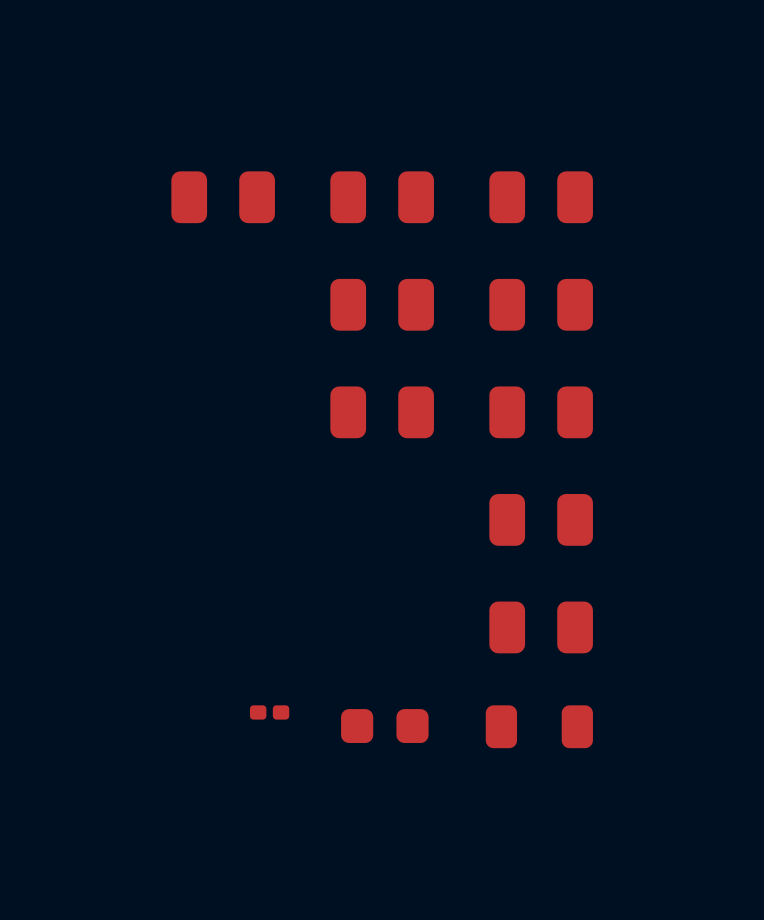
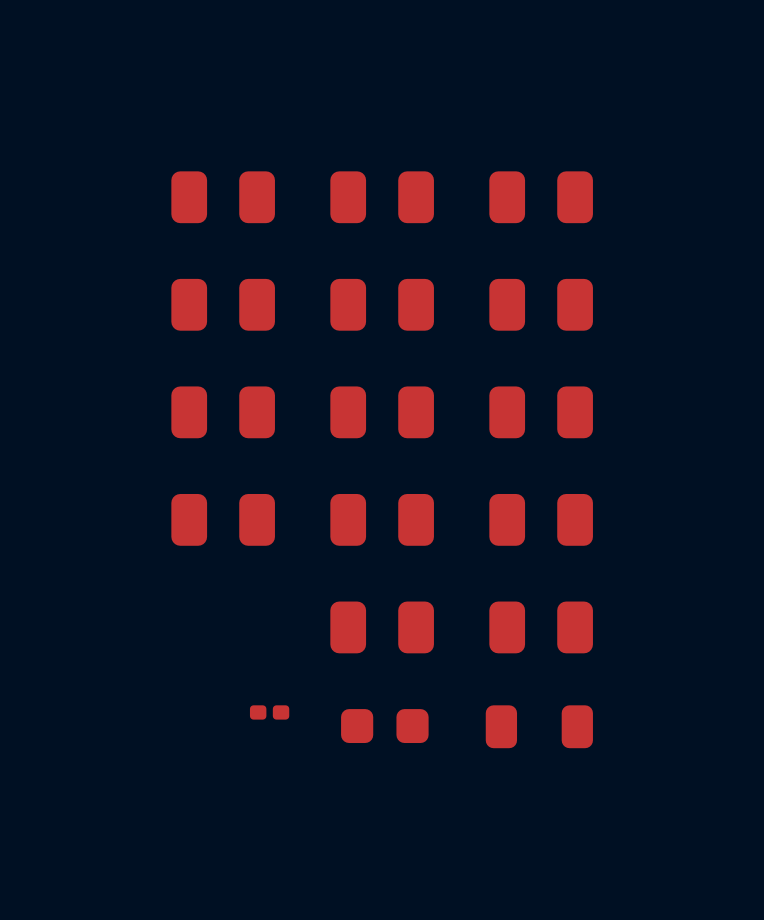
part: none -> (223, 304)
part: none -> (223, 412)
part: none -> (223, 519)
part: none -> (382, 519)
part: none -> (382, 627)

